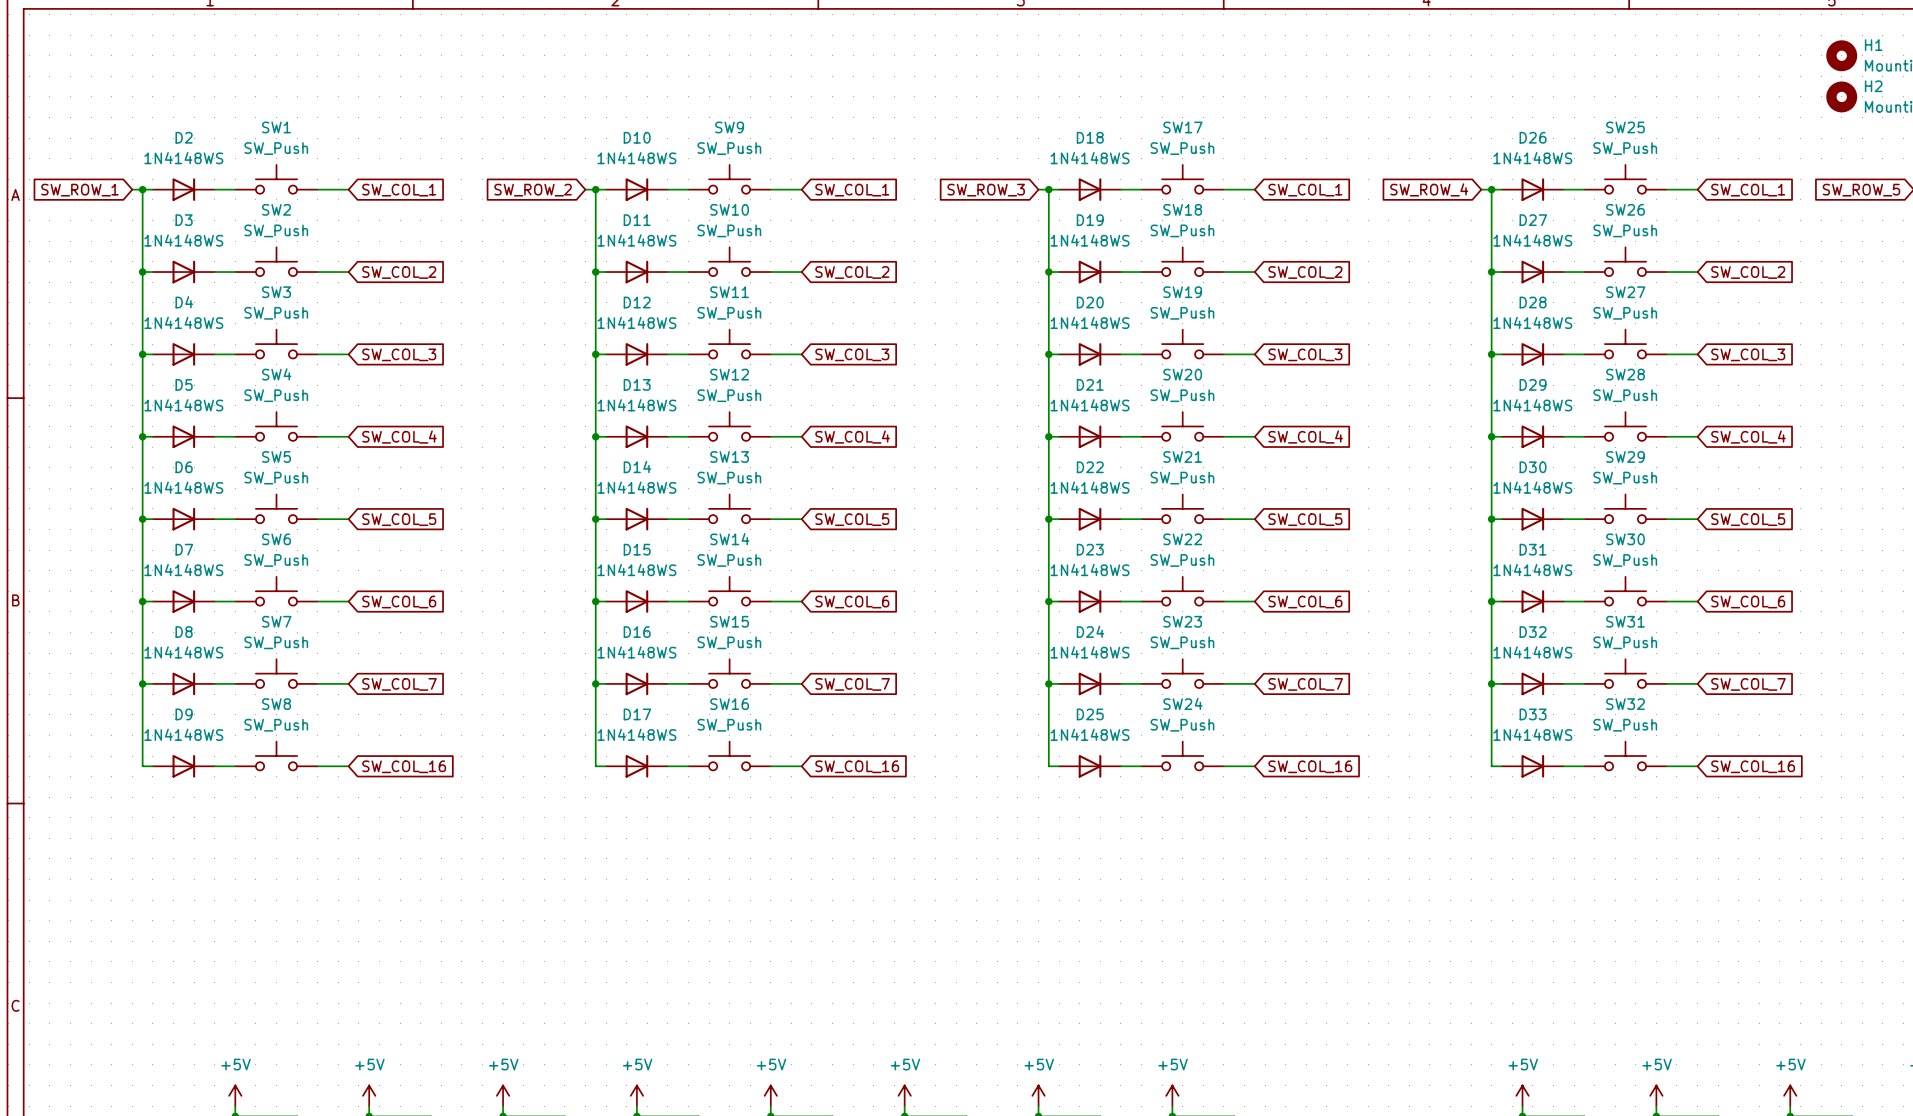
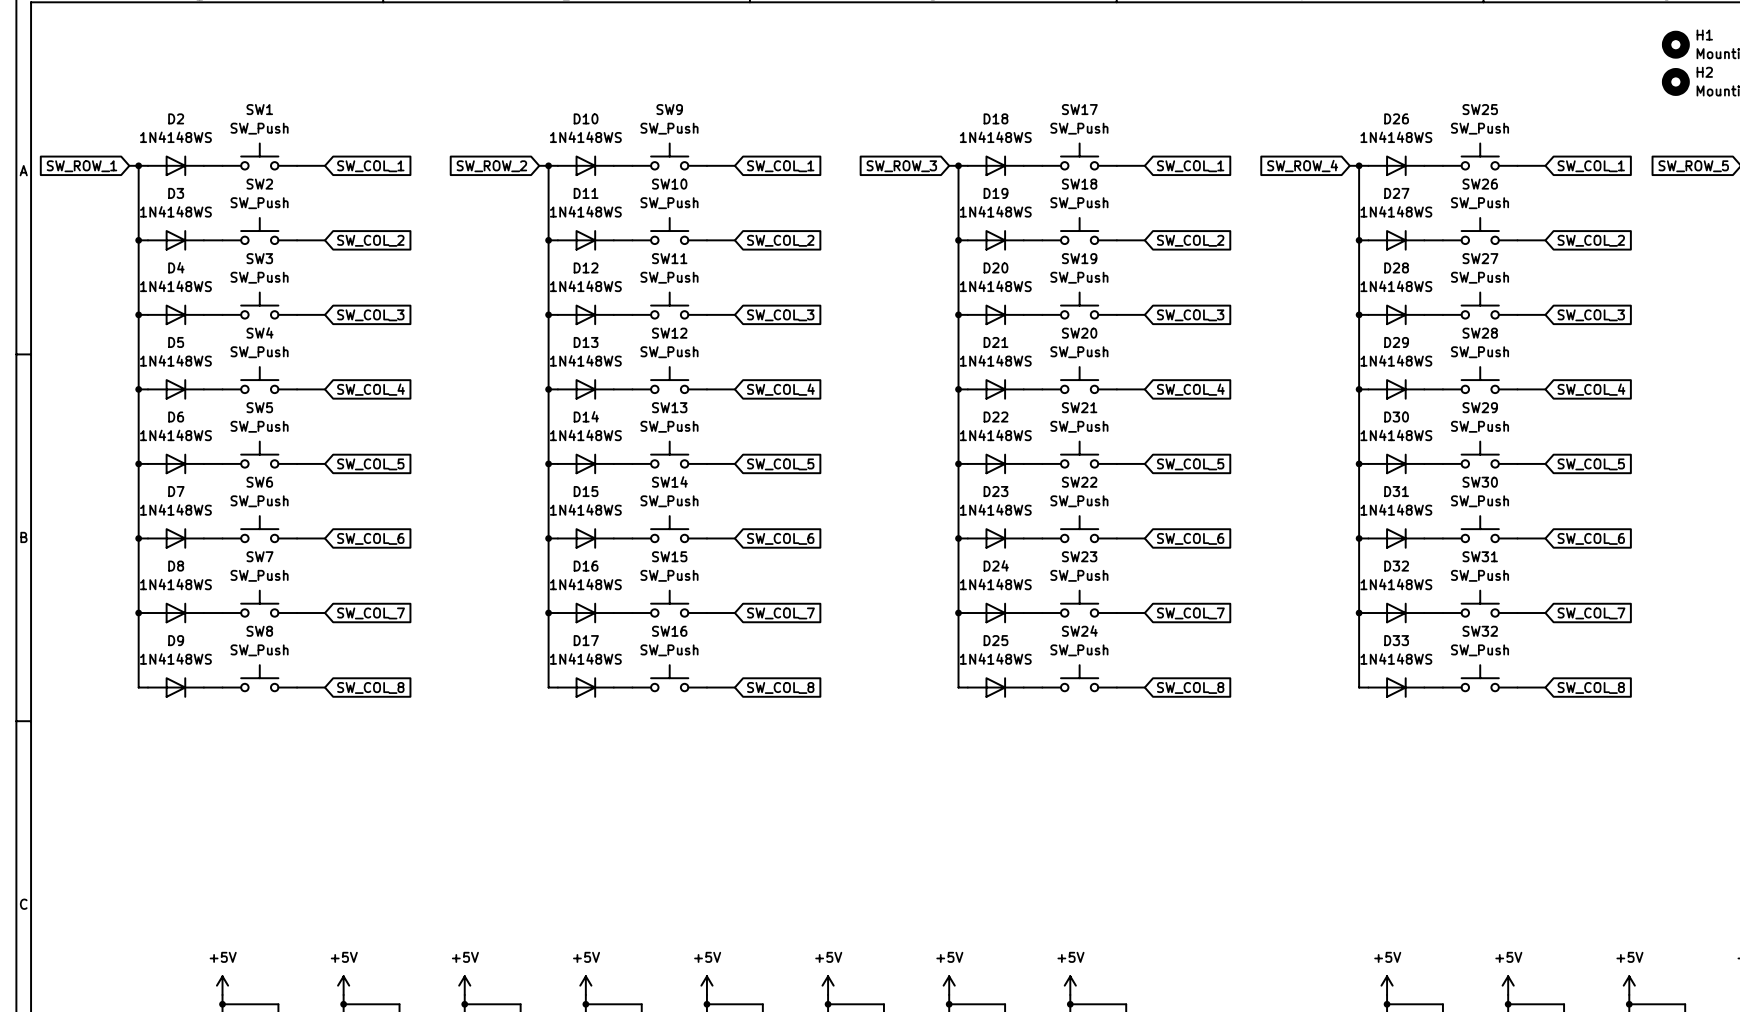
global label: SW_COL_16 (404, 766) -> SW_COL_8 (370, 687)
global label: SW_COL_16 (857, 766) -> SW_COL_8 (780, 687)
global label: SW_COL_16 (1310, 766) -> SW_COL_8 (1190, 687)
global label: SW_COL_16 (1753, 766) -> SW_COL_8 (1591, 687)

